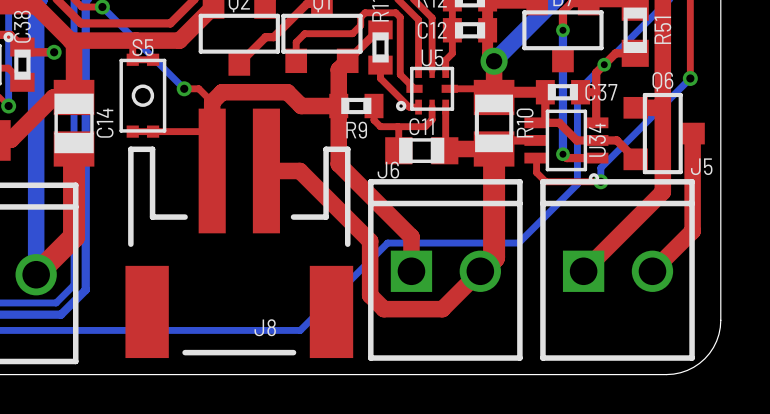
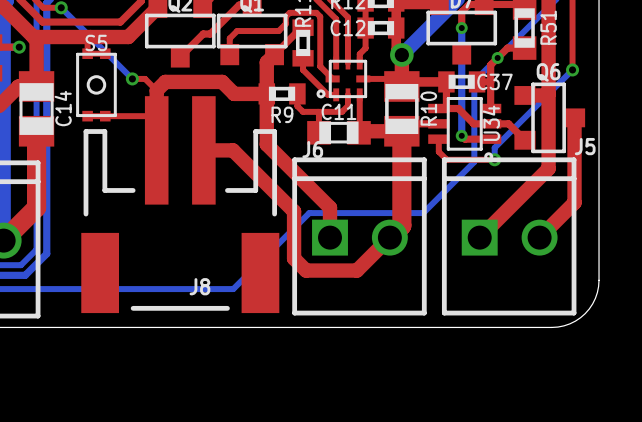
U5 name: U5 (432, 57) -> none

